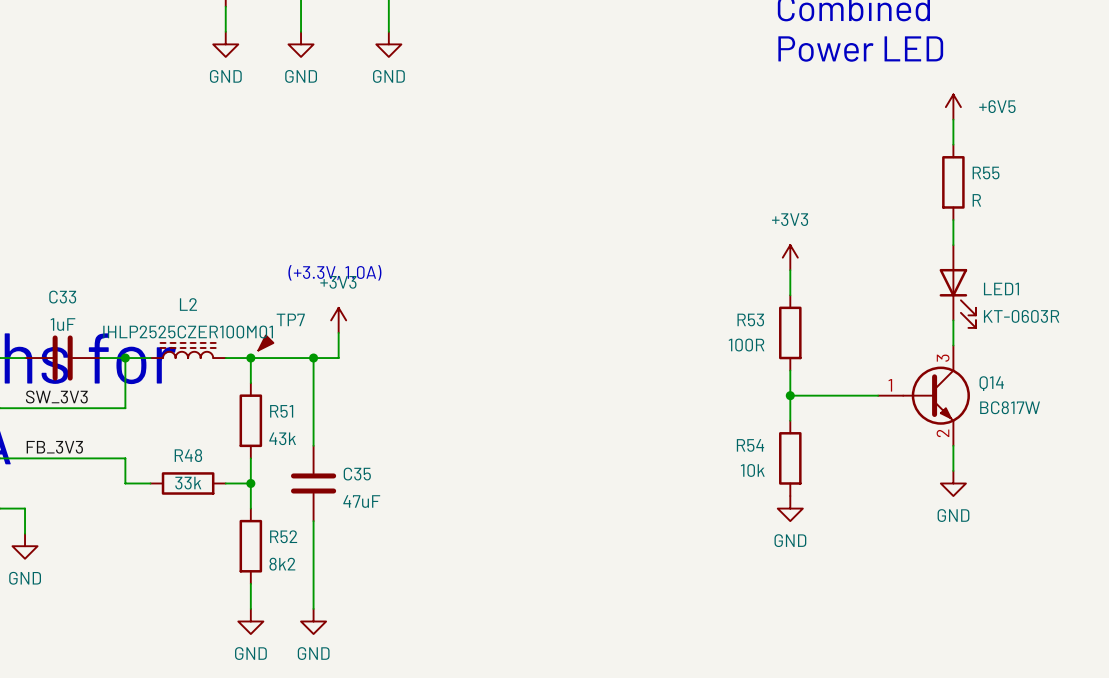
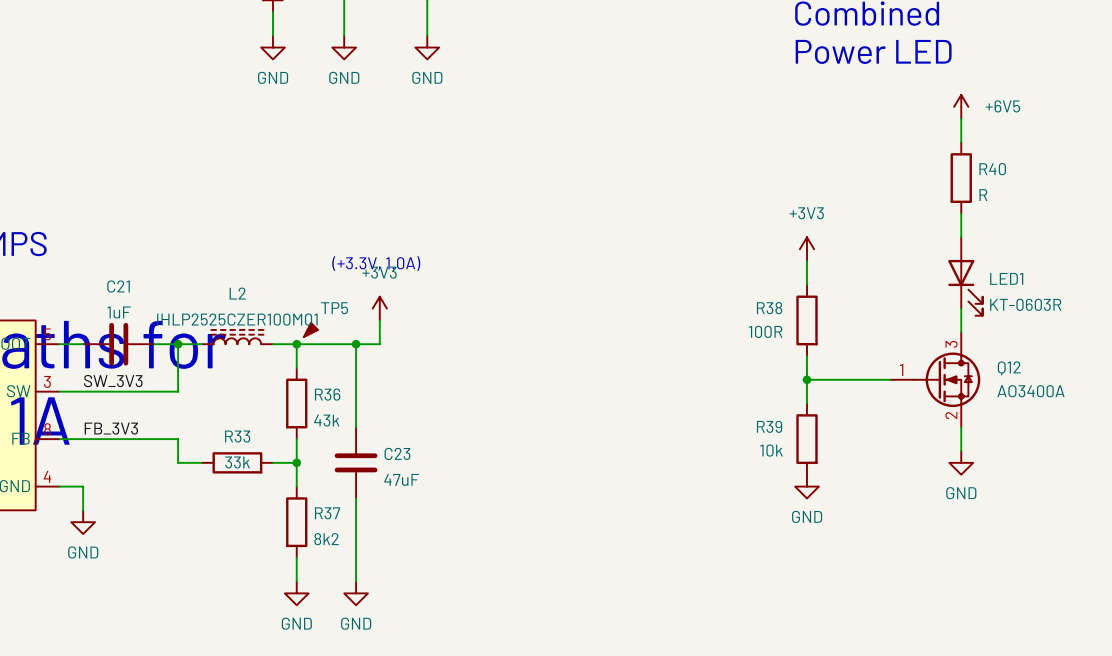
R55 name: R55 (986, 173) -> R40 (992, 169)
C33 name: C33 (62, 297) -> C21 (118, 286)
TP7 name: TP7 (290, 319) -> TP5 (334, 308)
R53 name: R53 (750, 319) -> R38 (769, 308)
Q14: BC817W (924, 395) -> none
Q12: none -> AO3400A (935, 379)
R51 name: R51 (281, 411) -> R36 (327, 394)
R54 name: R54 (750, 445) -> R39 (769, 426)
R48 name: R48 (188, 455) -> R33 (237, 436)
C35 name: C35 (357, 474) -> C23 (397, 453)
R52 name: R52 (283, 536) -> R37 (327, 513)

